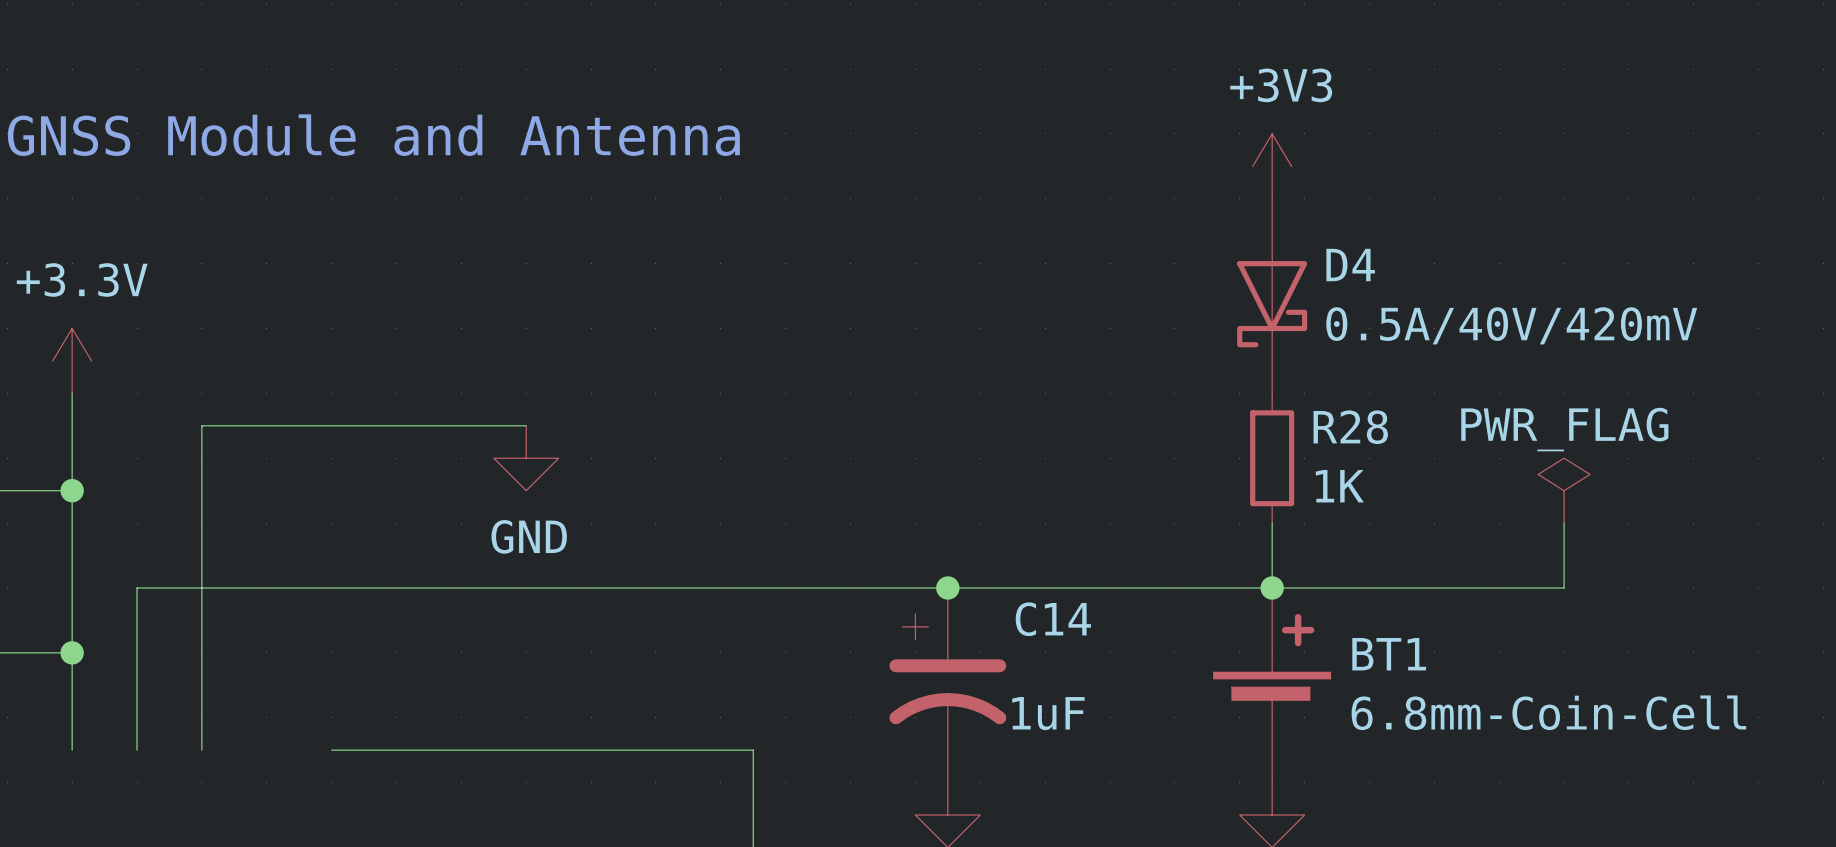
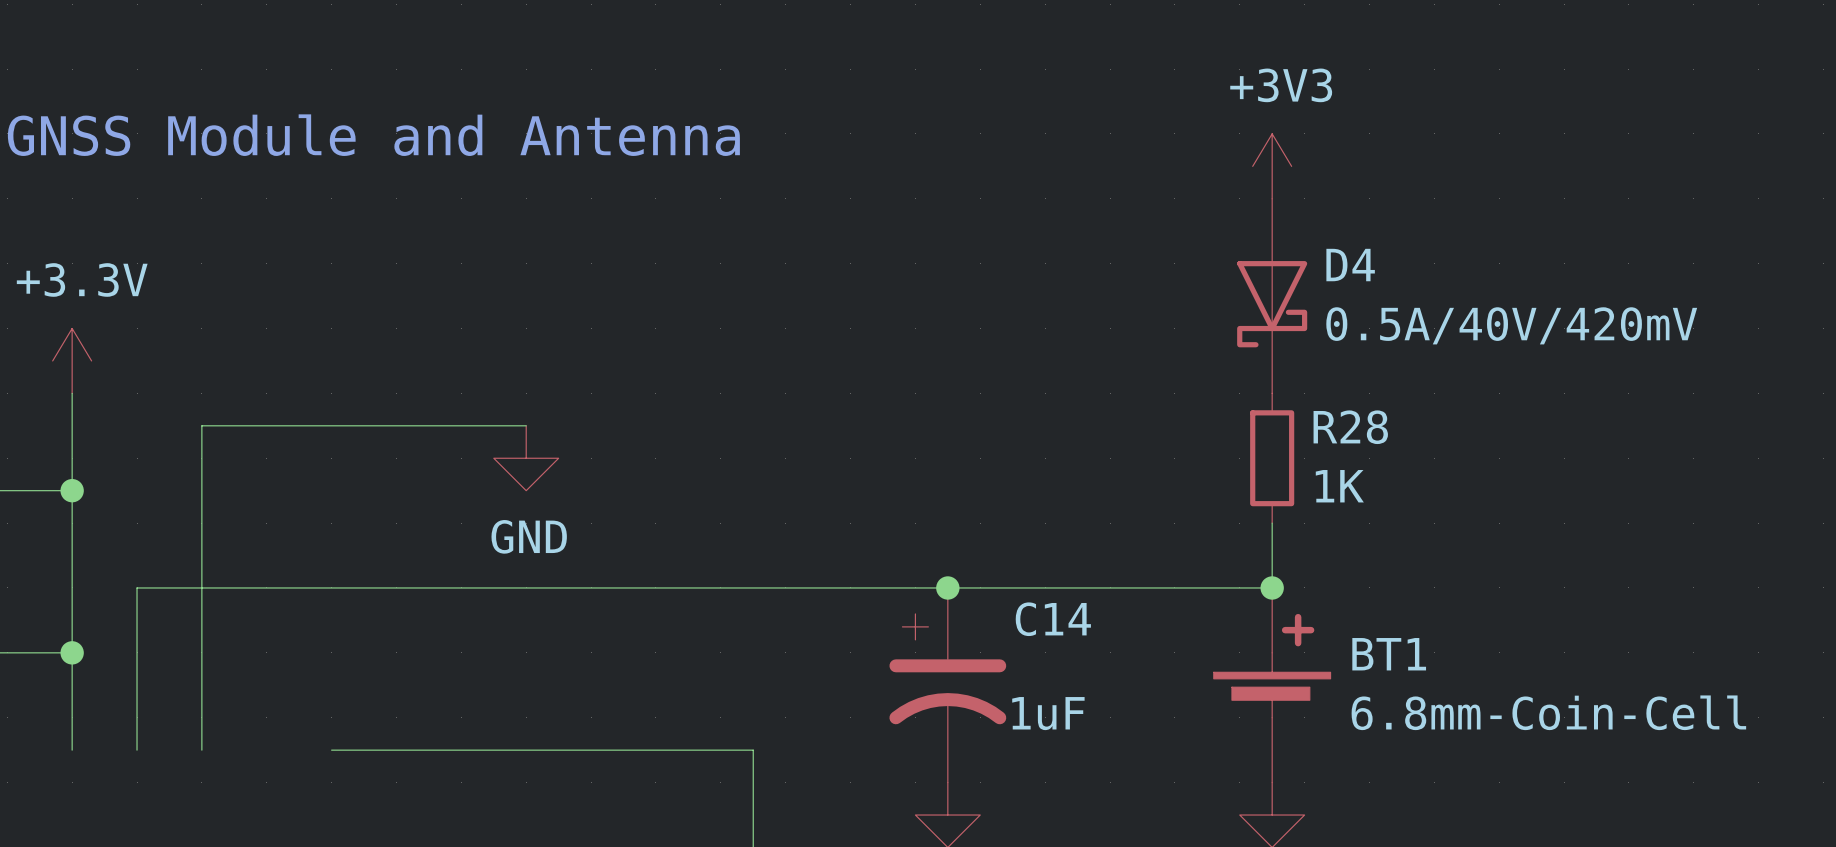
power symbol: PWR_FLAG (1564, 490) -> none
wire: (1564, 523) (1564, 587) (1272, 587) -> none

